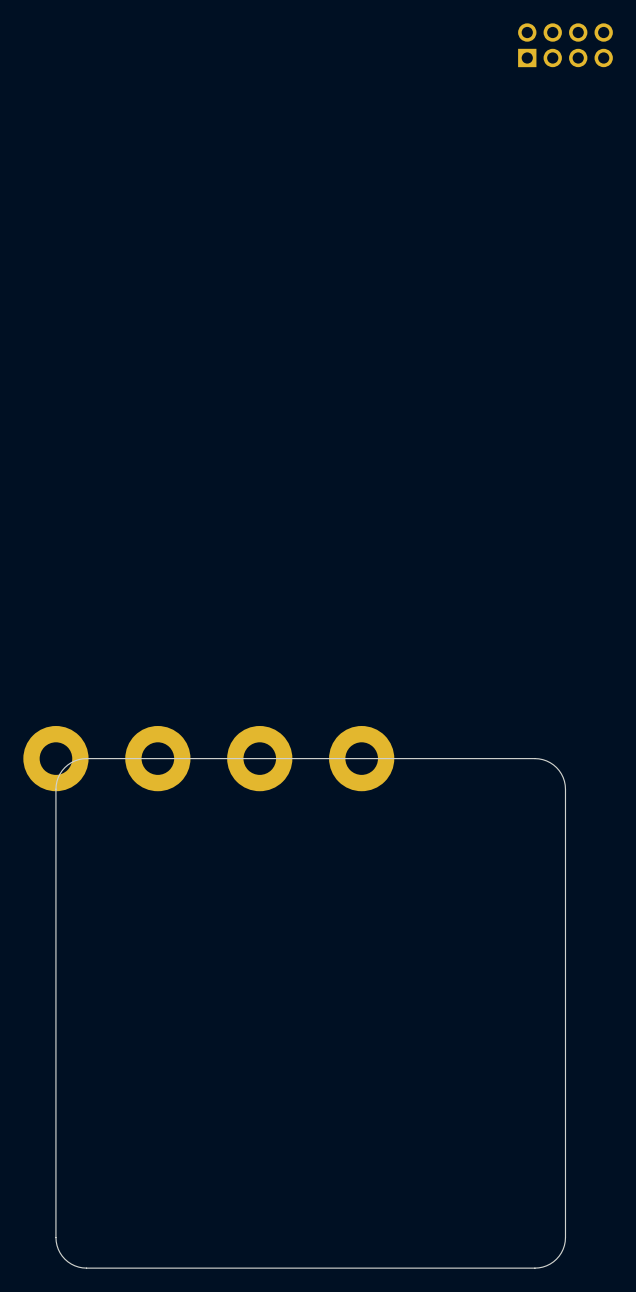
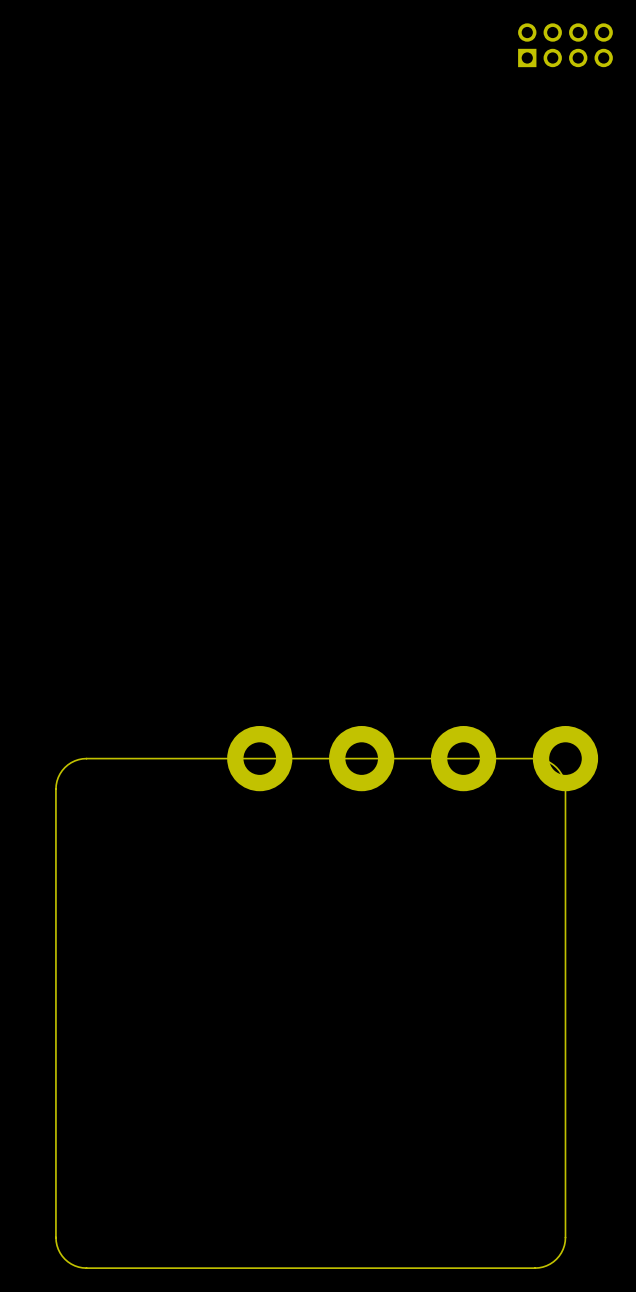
part: (55, 758) -> none
part: (157, 758) -> none
part: none -> (463, 758)
part: none -> (565, 758)

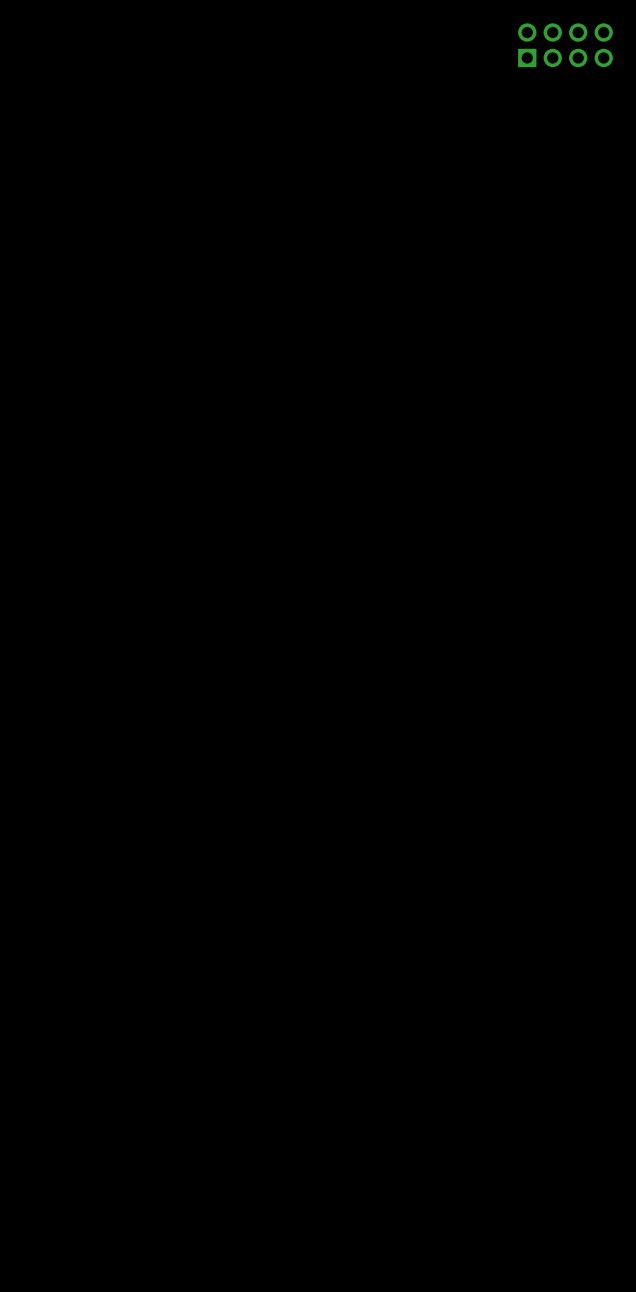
part: (259, 758) -> none
part: (361, 758) -> none
part: (463, 758) -> none
board edge: (534, 758) (86, 758) (74, 760) (64, 767) (58, 777) (55, 789) (55, 1237) (58, 1249) (64, 1259) (74, 1265) (86, 1268) (534, 1268) (546, 1265) (556, 1259) (563, 1249) (565, 1237) (565, 789) (563, 777) (556, 767) (546, 760) (534, 758) -> none
part: (565, 758) -> none

